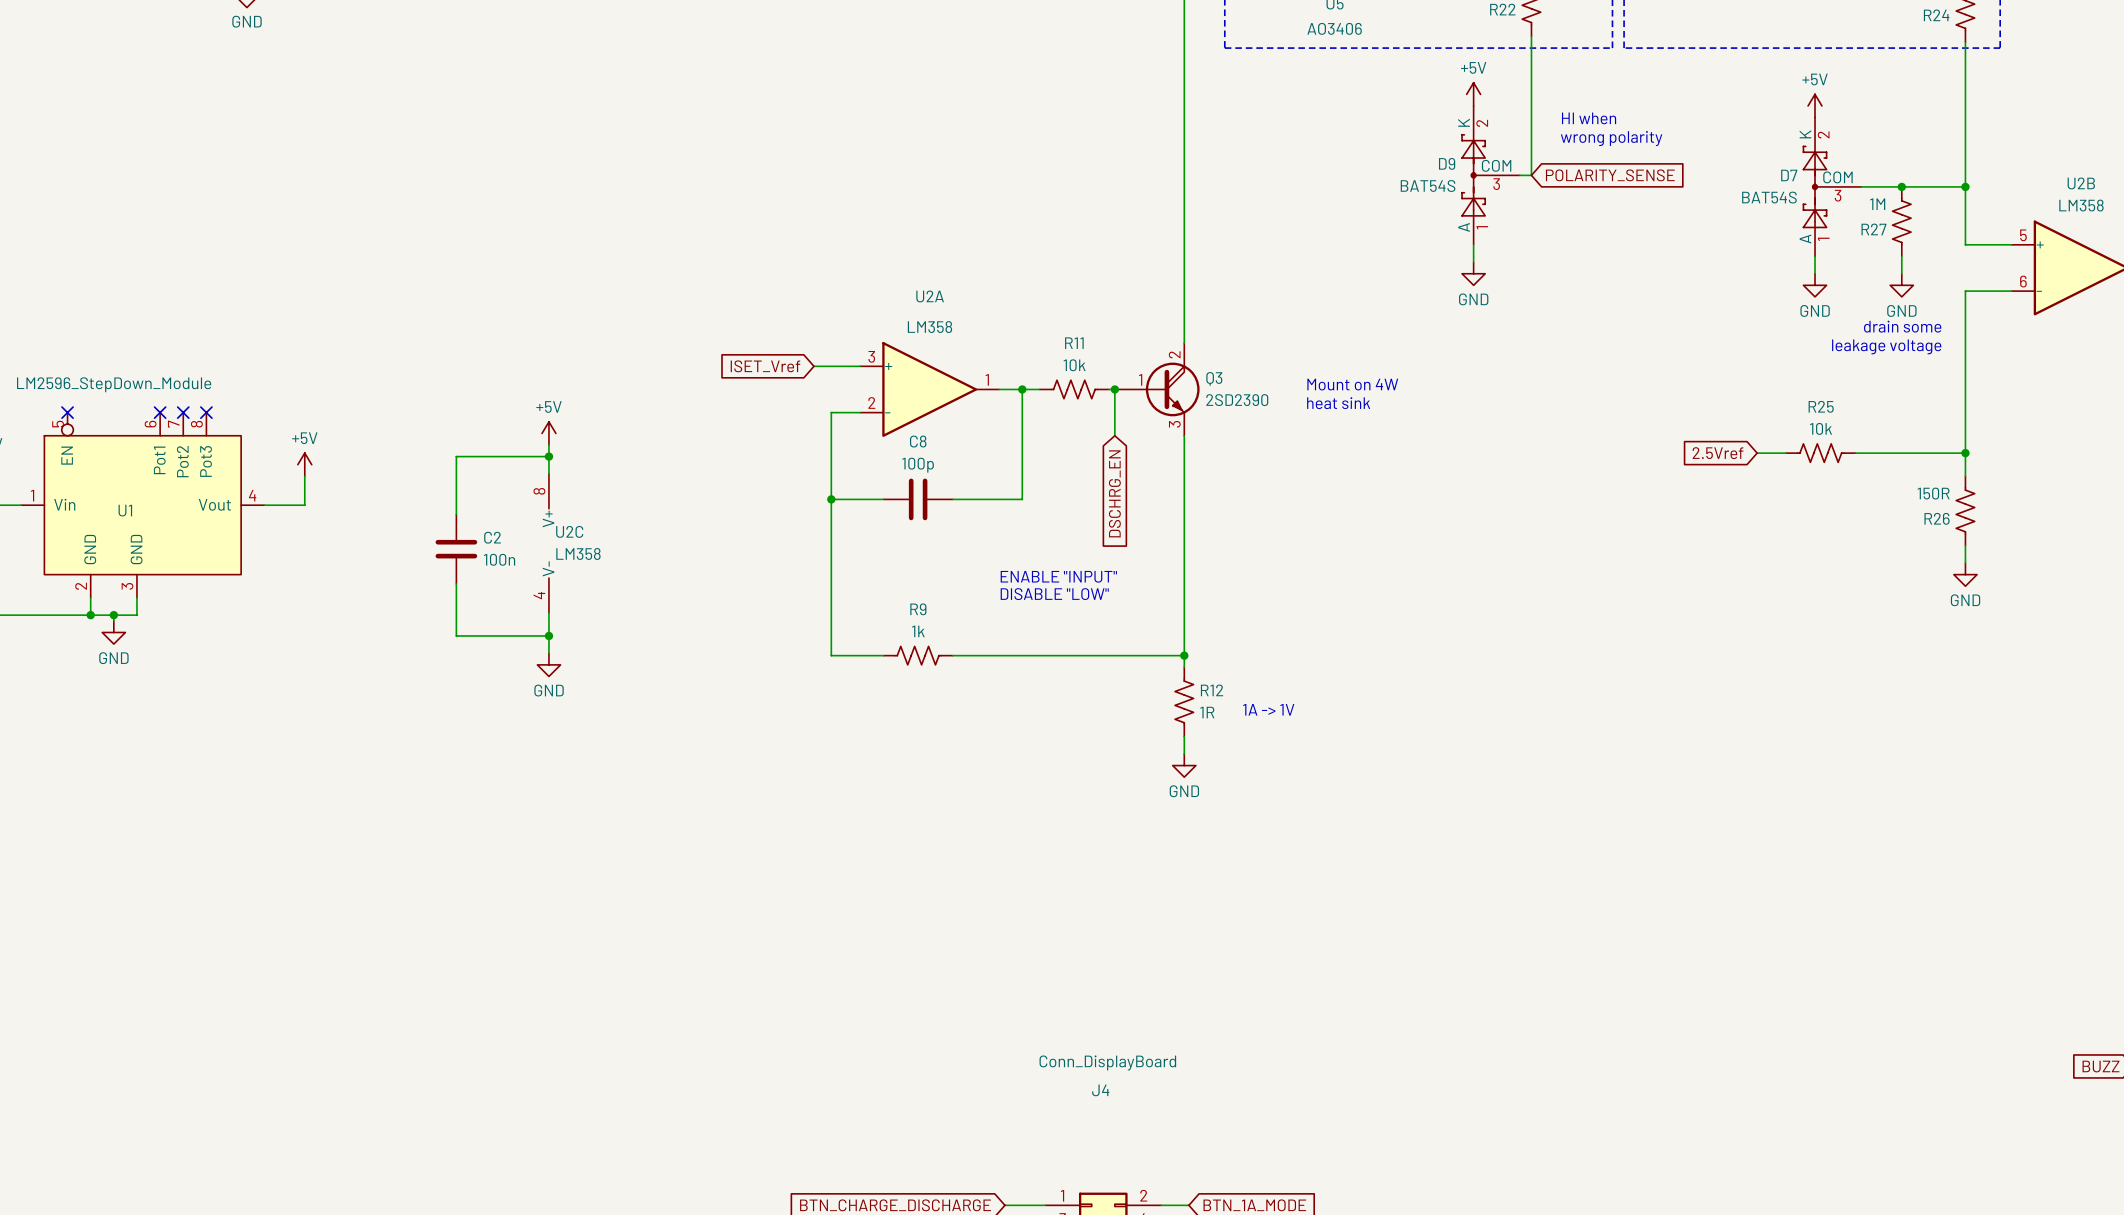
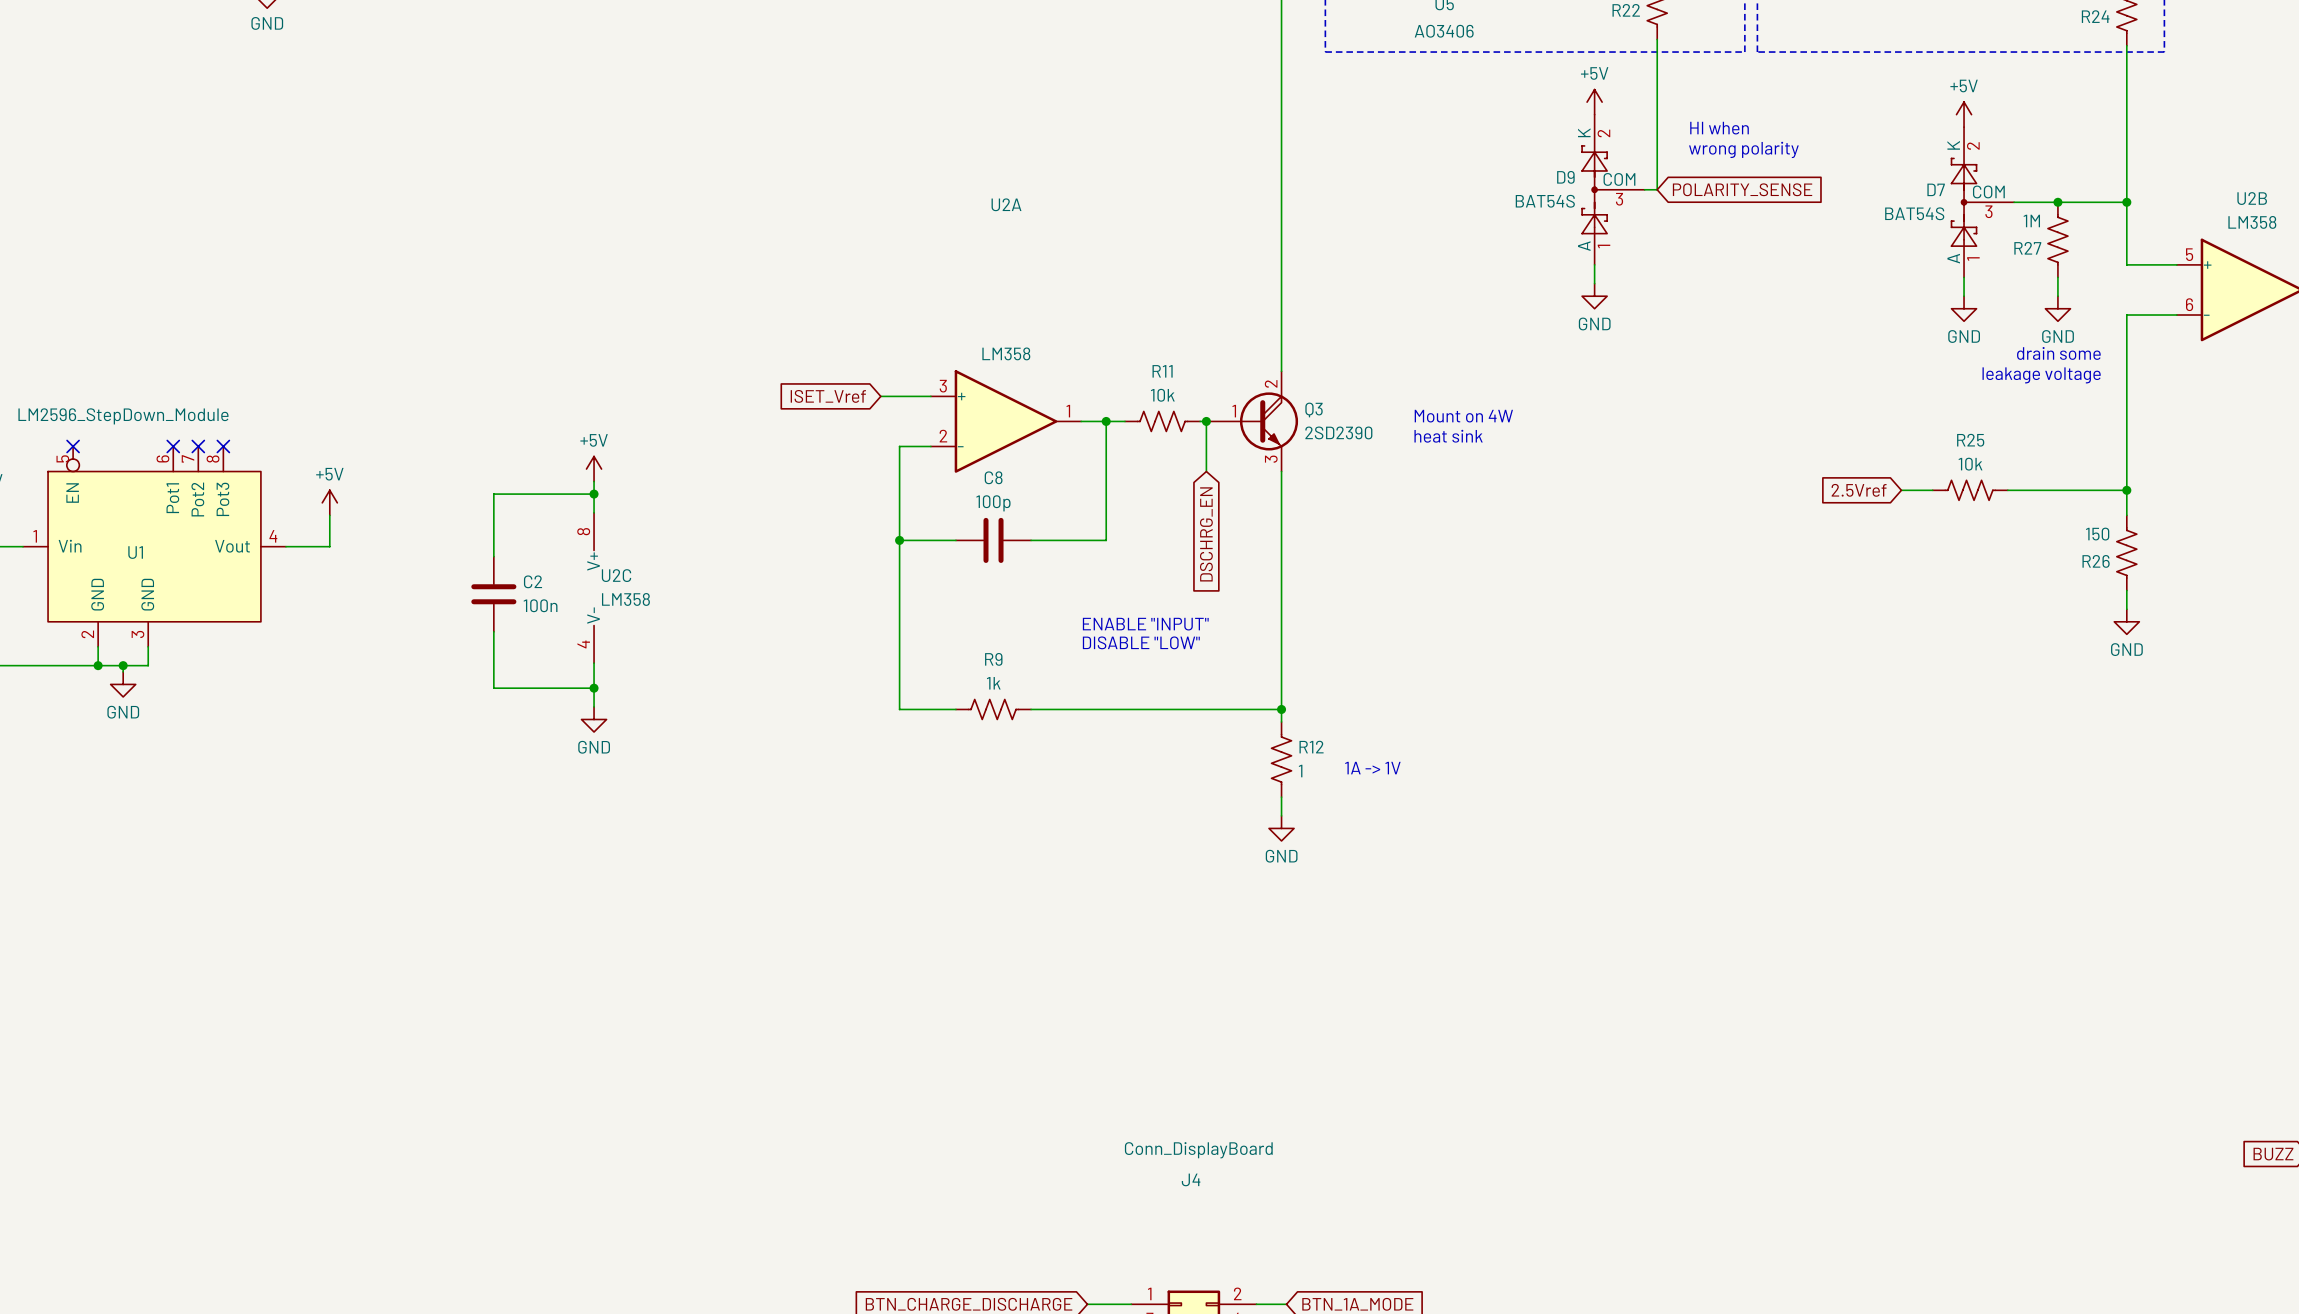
U2A name position: U2A (930, 296) -> U2A (1006, 204)
R26 value: 150R (1933, 493) -> 150 (2097, 534)
R12 value: 1R (1207, 712) -> 1 (1300, 771)

